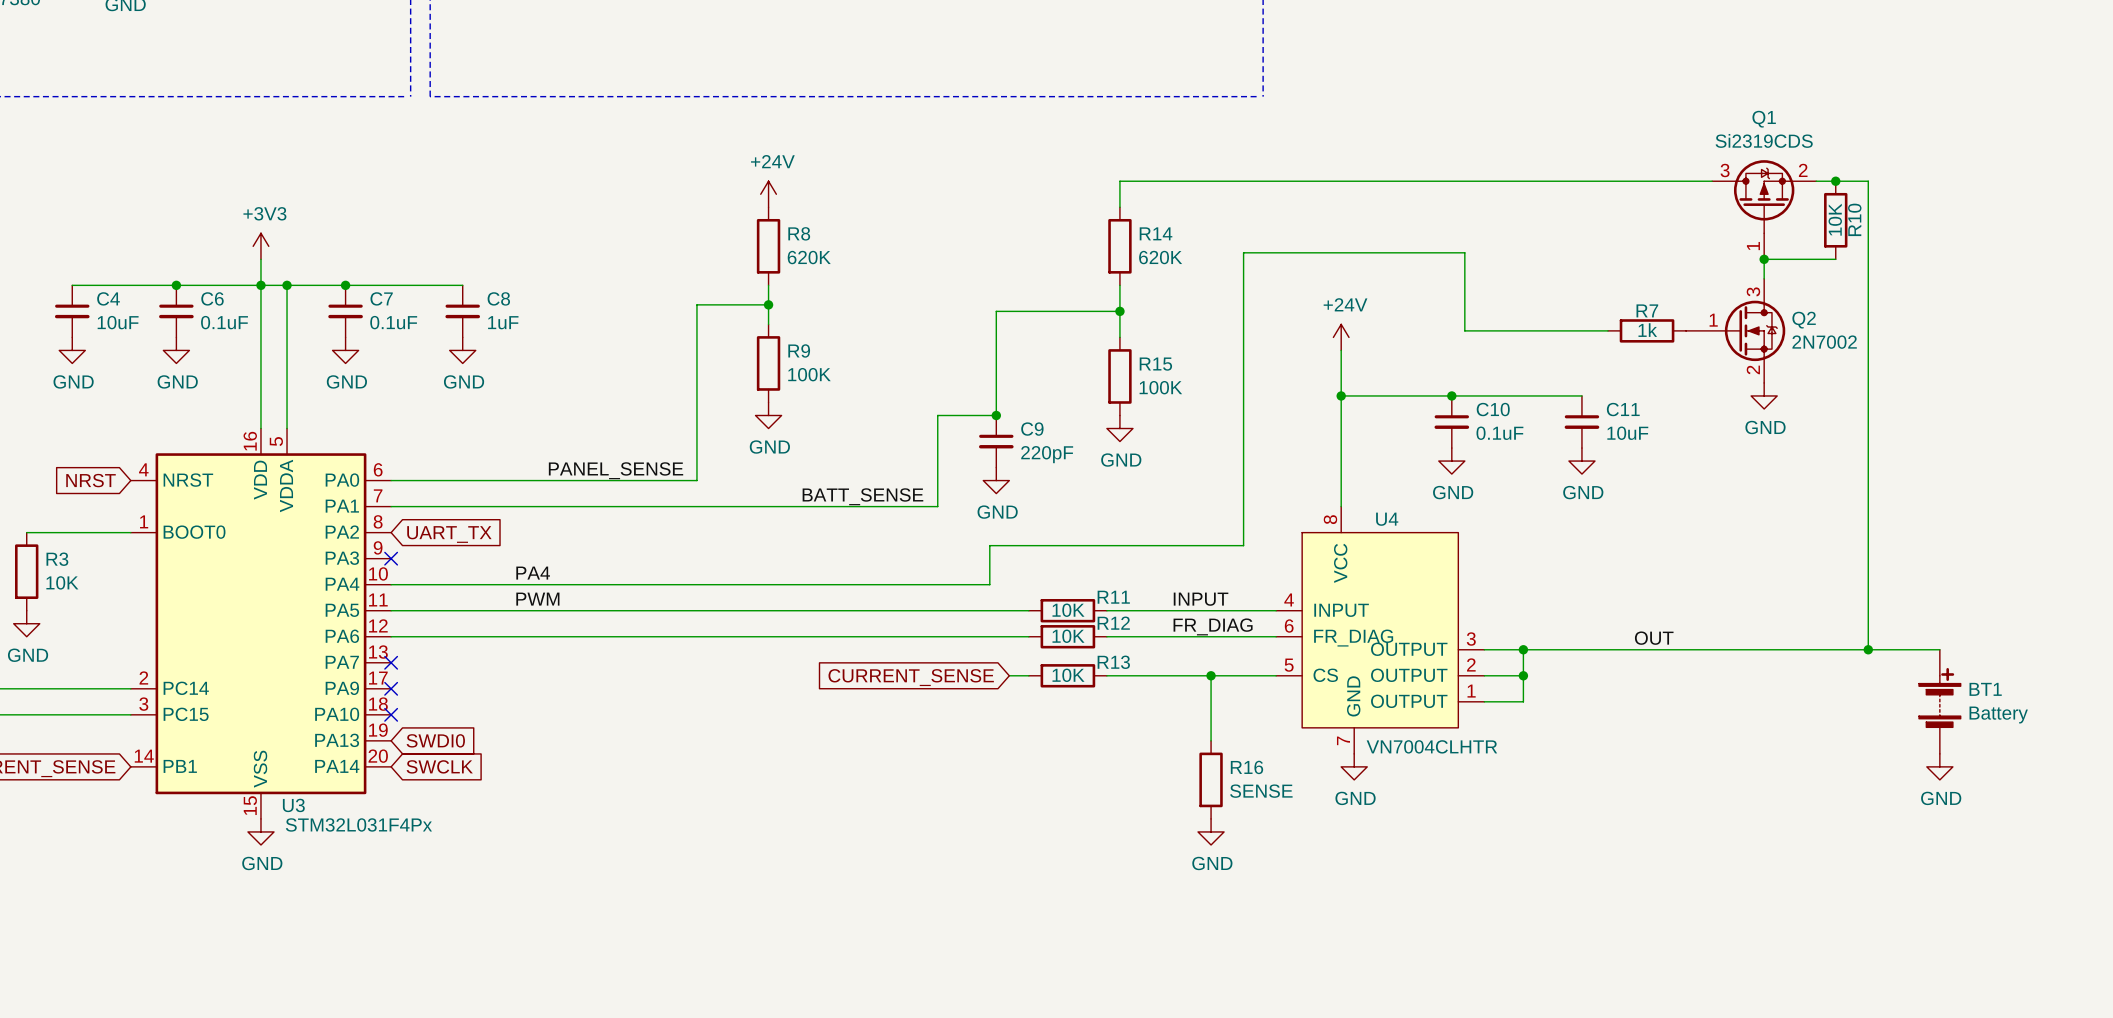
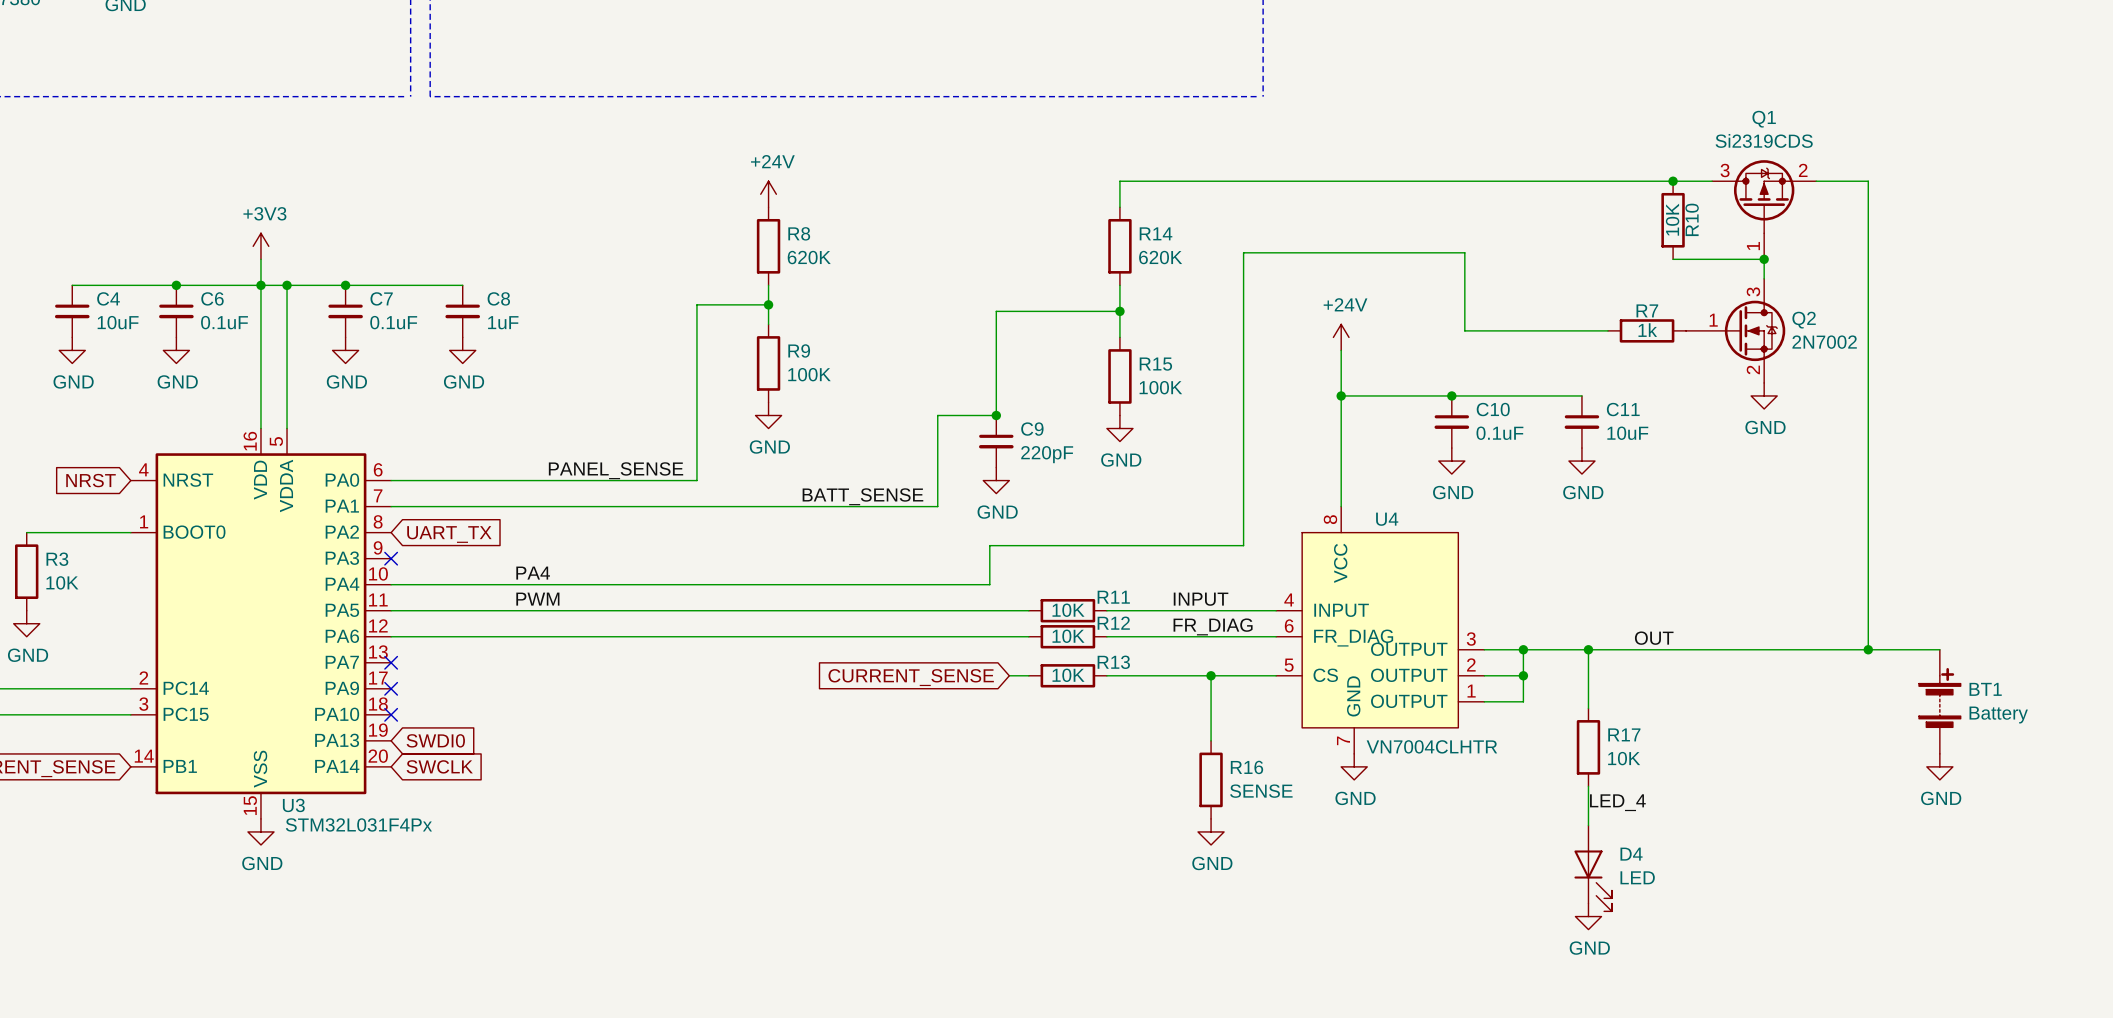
junction: none -> (1673, 181)
junction: (1835, 181) -> none
R10 position: (1835, 220) -> (1673, 220)
wire: (1764, 259) (1835, 259) -> (1764, 259) (1673, 259)
wire: none -> (1588, 649) (1588, 708)
junction: none -> (1588, 649)
R17: none -> 10K (1588, 747)
wire: none -> (1588, 786) (1588, 825)
label: none -> LED_4 (1617, 802)
D4: none -> LED (1593, 868)
power symbol: none -> GND (1588, 916)

